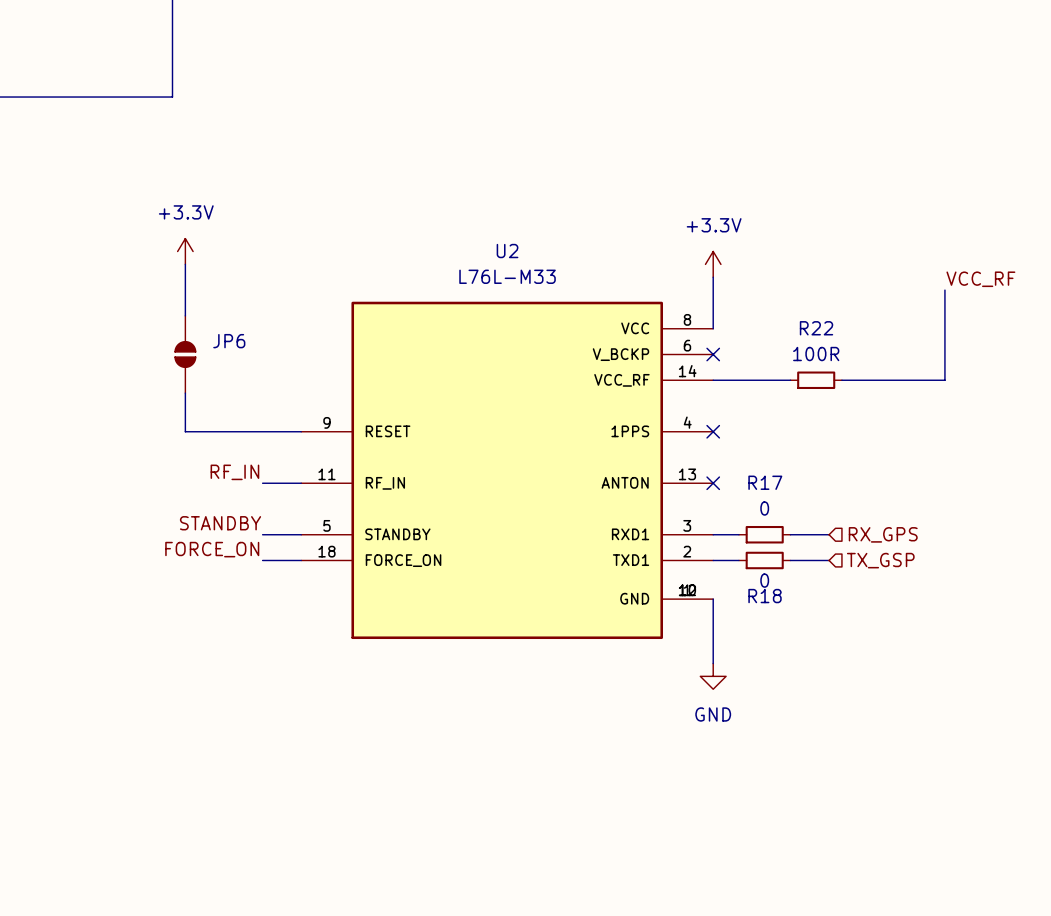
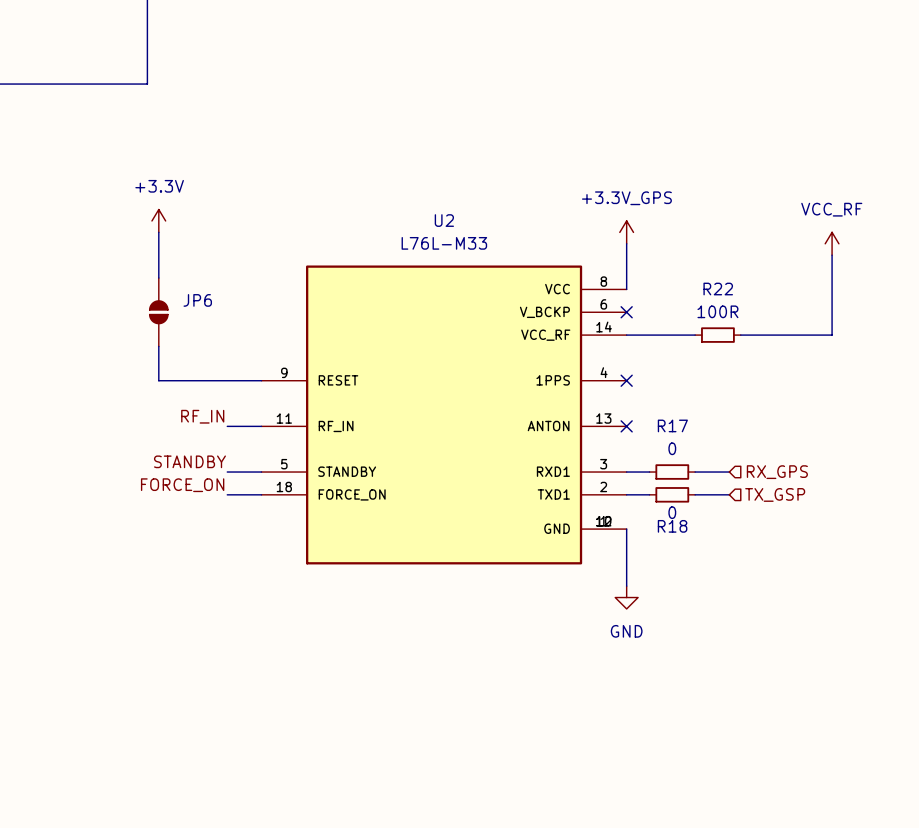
power symbol: +3.3V (713, 264) -> +3.3V_GPS (626, 232)
power symbol: none -> VCC_RF (832, 243)
label: VCC_RF (980, 279) -> none

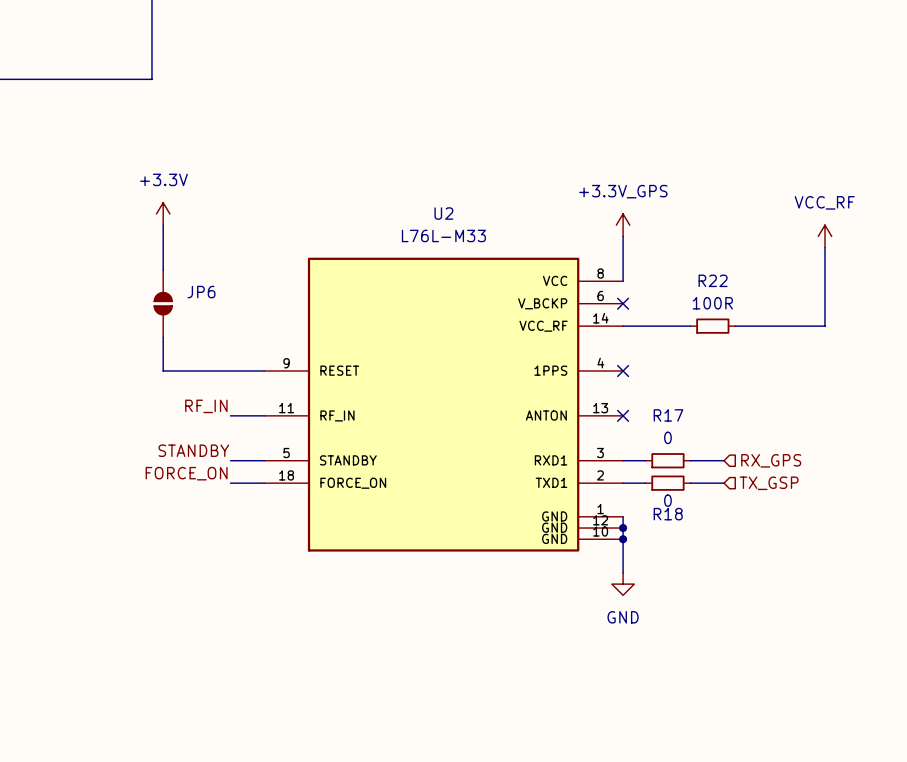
U2 symbol: [261, 265, 627, 565] -> [264, 257, 624, 552]
junction: none -> (623, 528)
junction: none -> (623, 539)

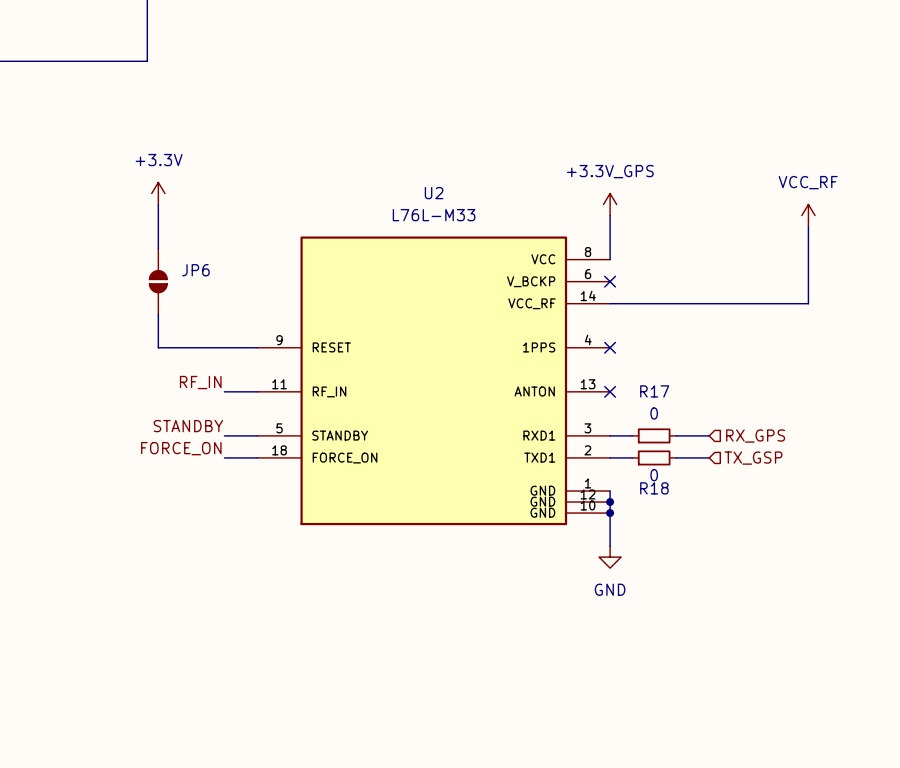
wire: none -> (676, 303) (720, 303)
R22: 100R (712, 326) -> none

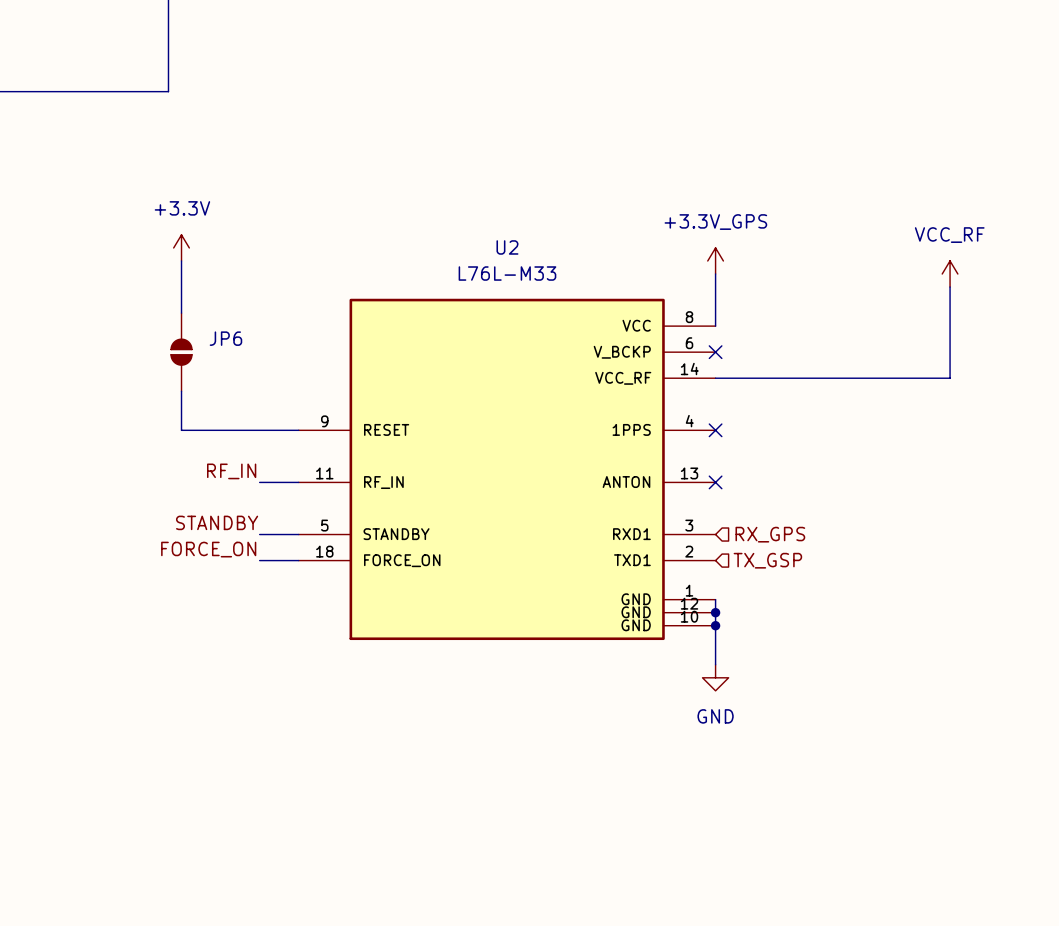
wire: (610, 435) (632, 435) -> none
R17: 0 (654, 435) -> none
wire: (676, 435) (709, 435) -> none
hierarchical label position: RX_GPS (755, 436) -> RX_GPS (770, 534)
wire: (610, 457) (632, 457) -> none
R18: 0 (654, 457) -> none
wire: (676, 457) (709, 457) -> none
hierarchical label position: TX_GSP (753, 458) -> TX_GSP (767, 560)

